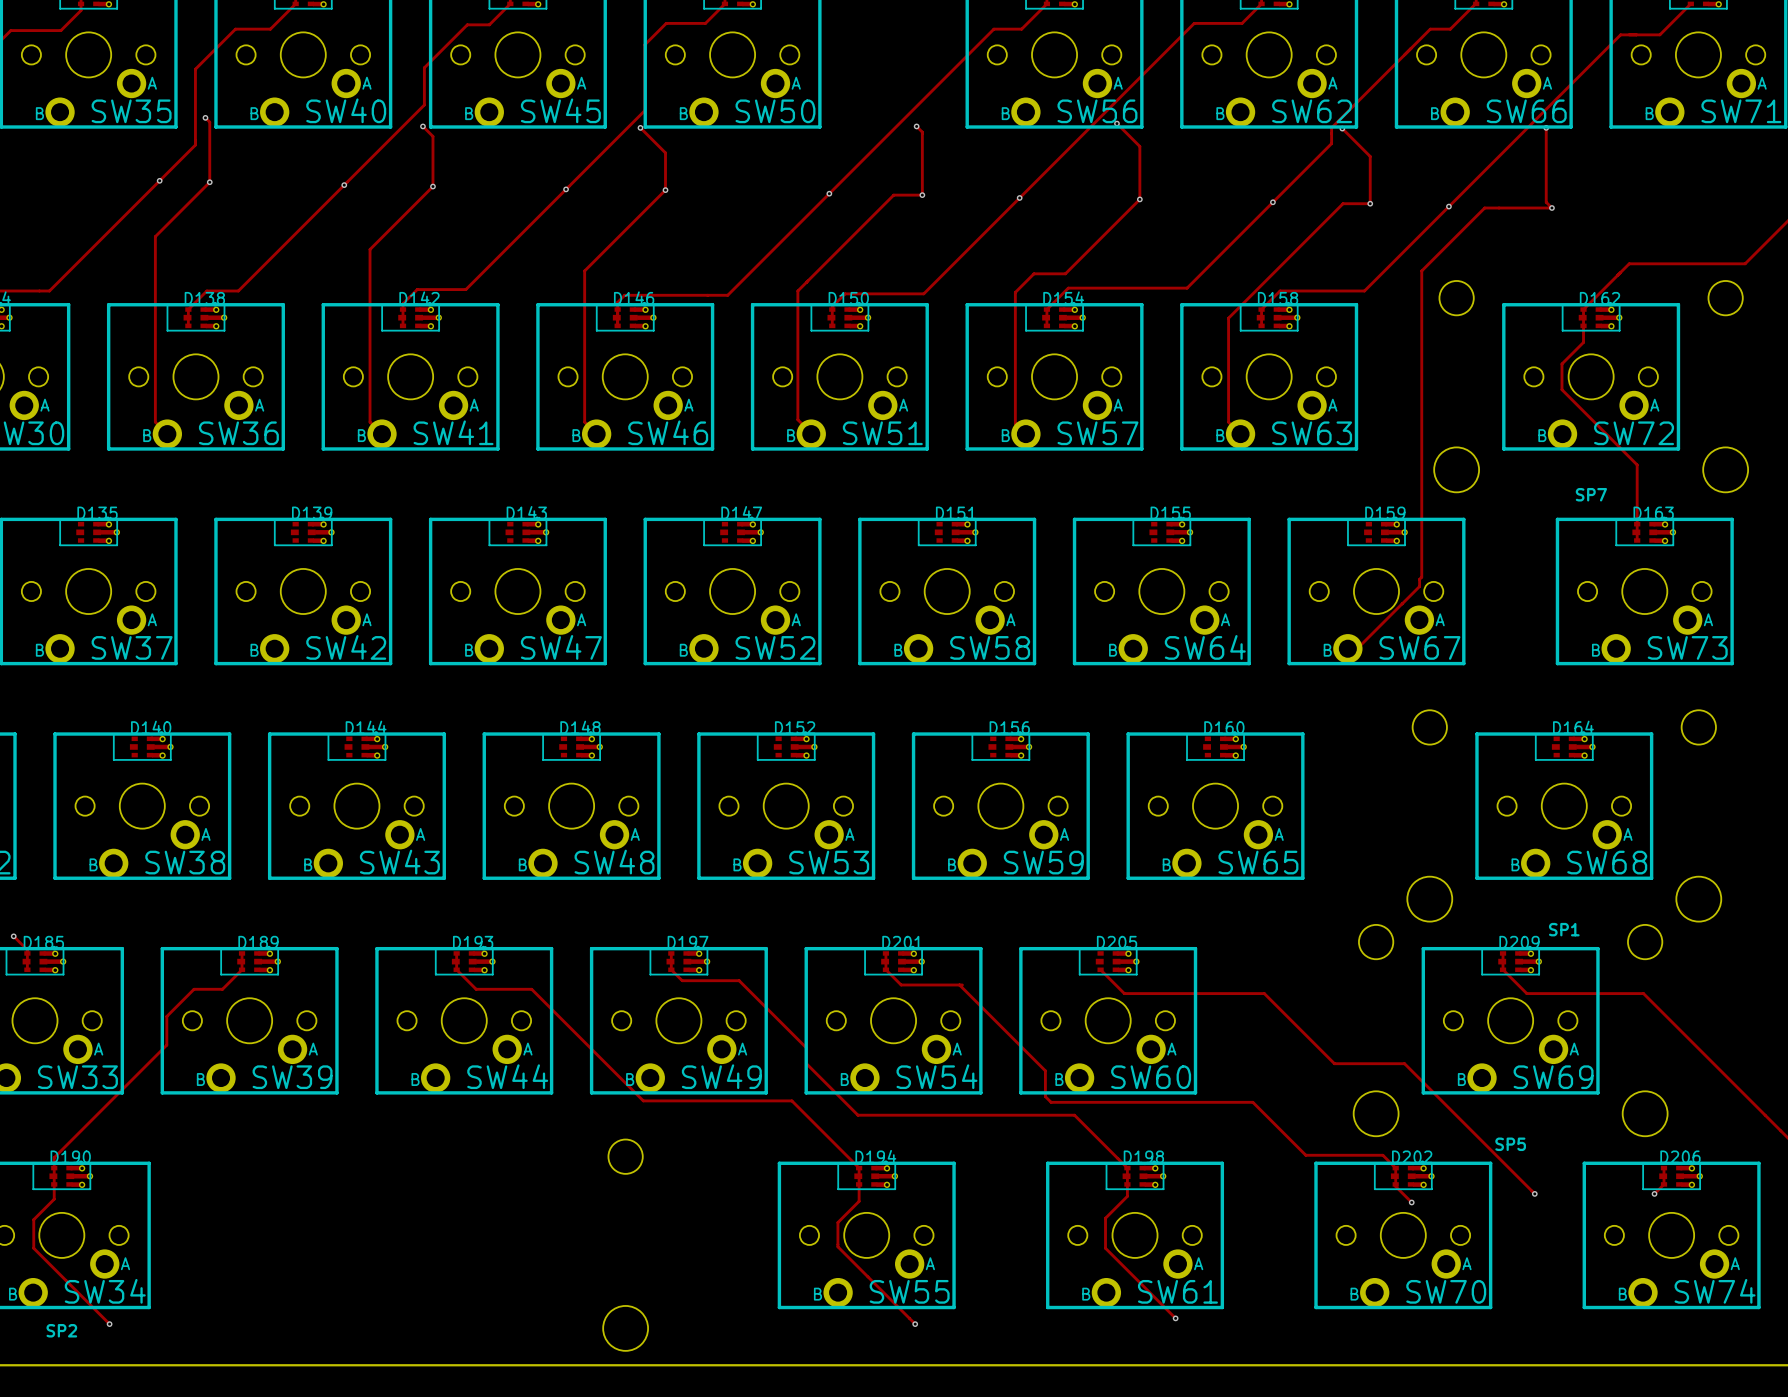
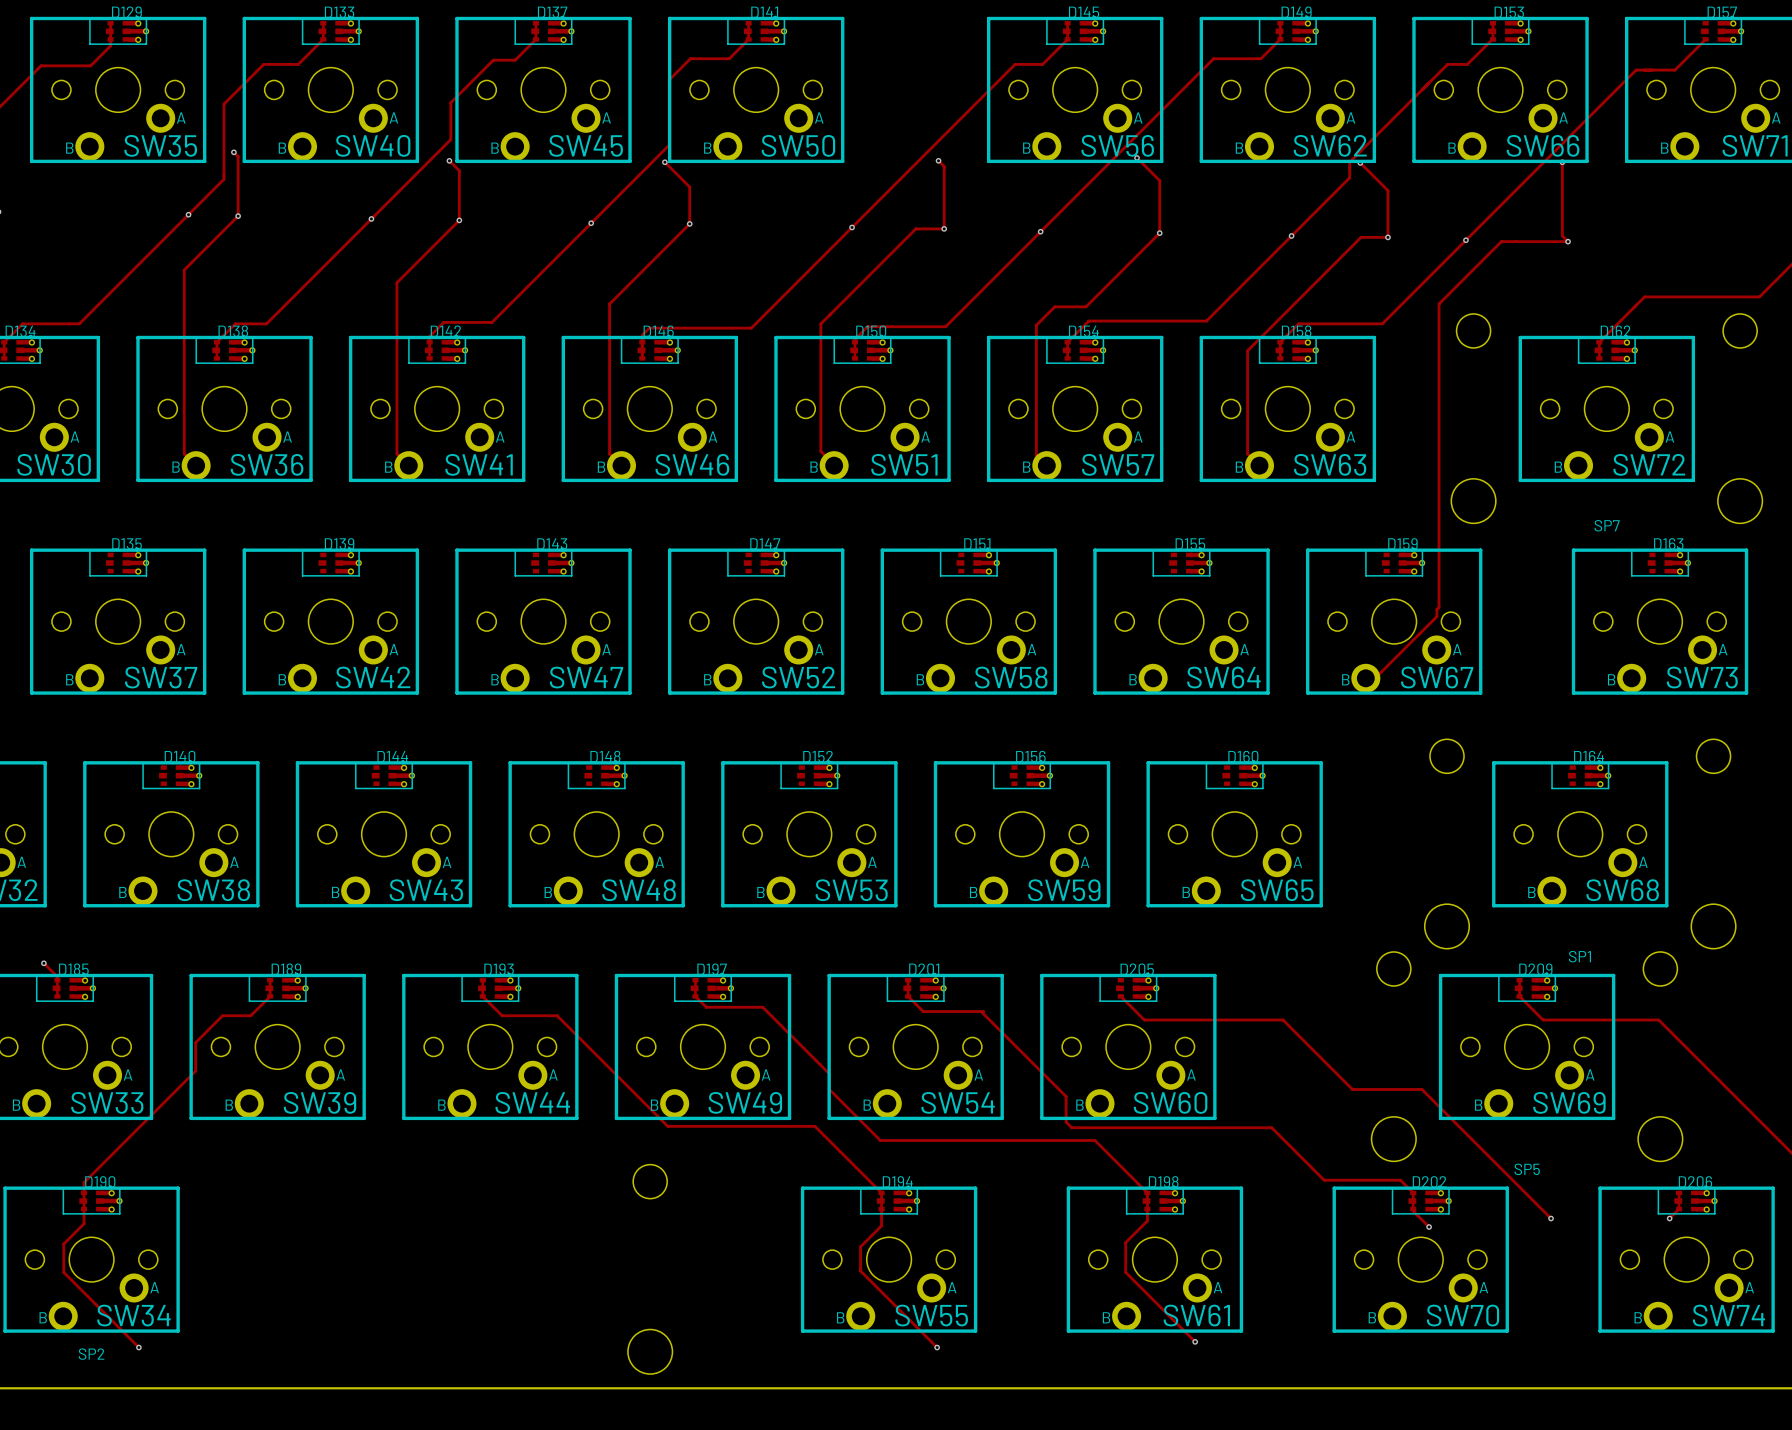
track: (1583, 325) (1583, 342) (1561, 363) (1561, 389) (1637, 464) (1637, 540) -> none

